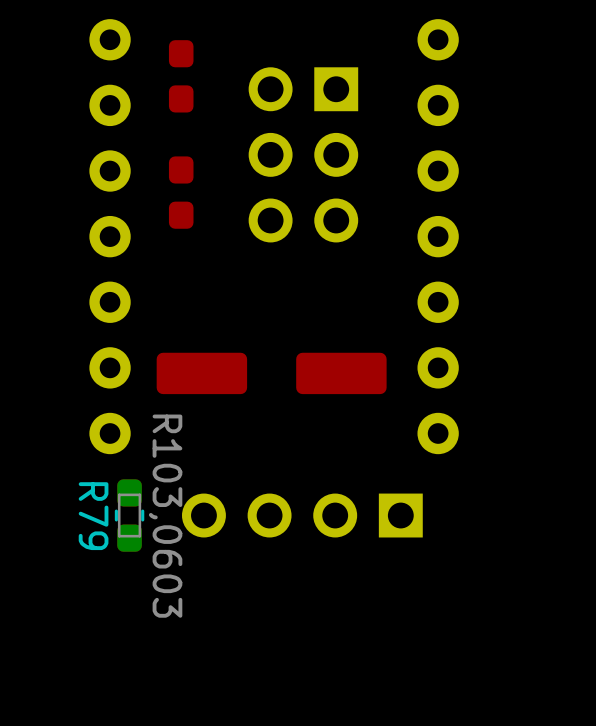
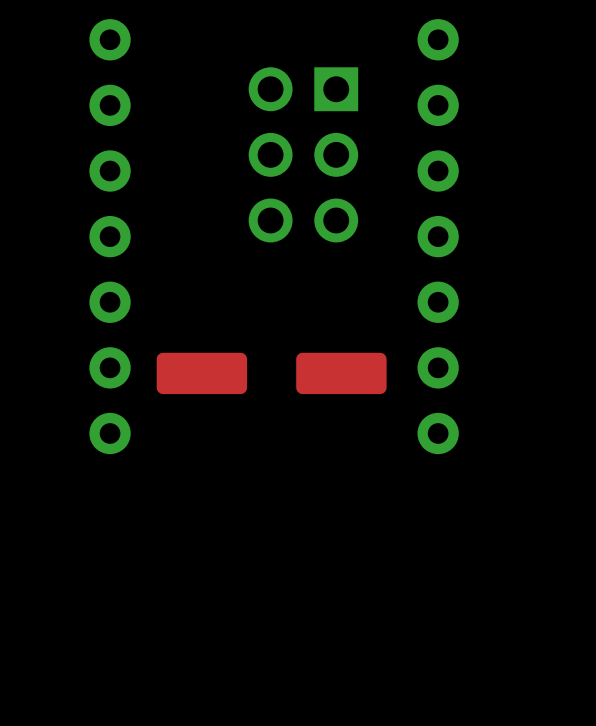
part: (181, 76) -> none
part: (181, 192) -> none
R79: R103,0603 (129, 515) -> none
part: (302, 515) -> none

